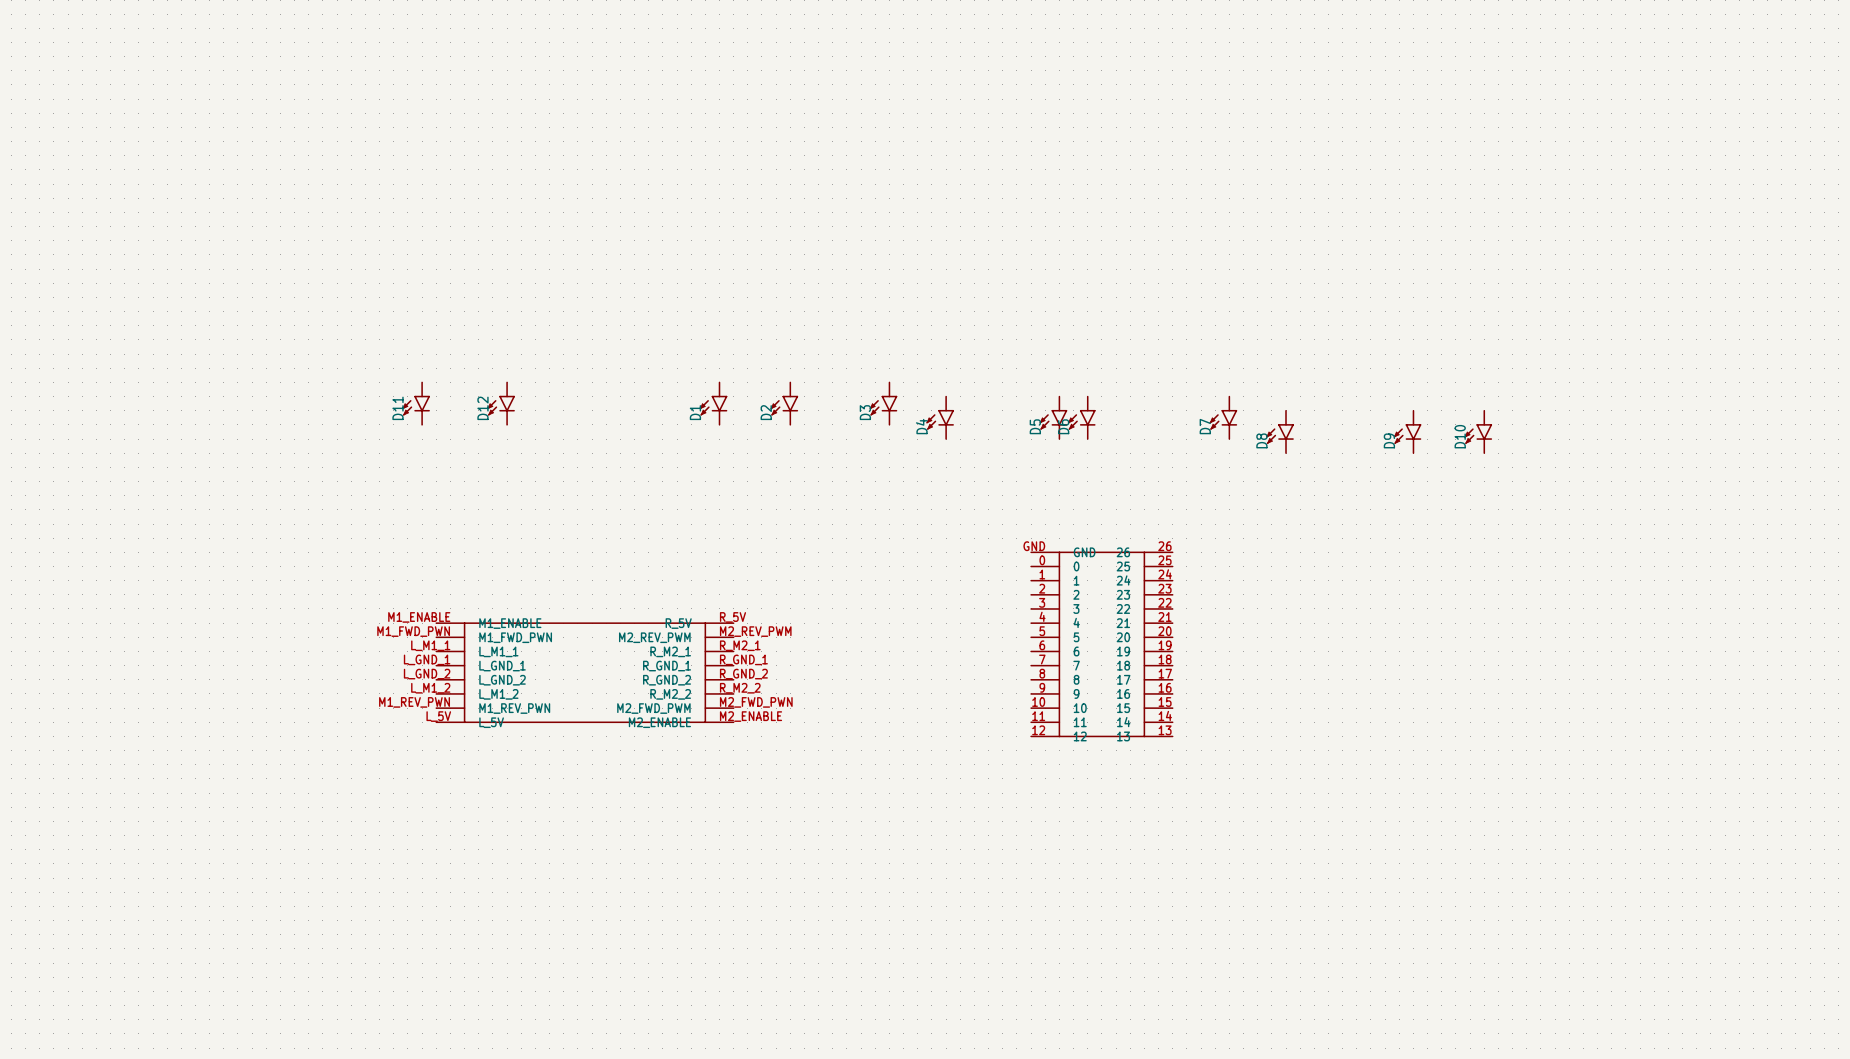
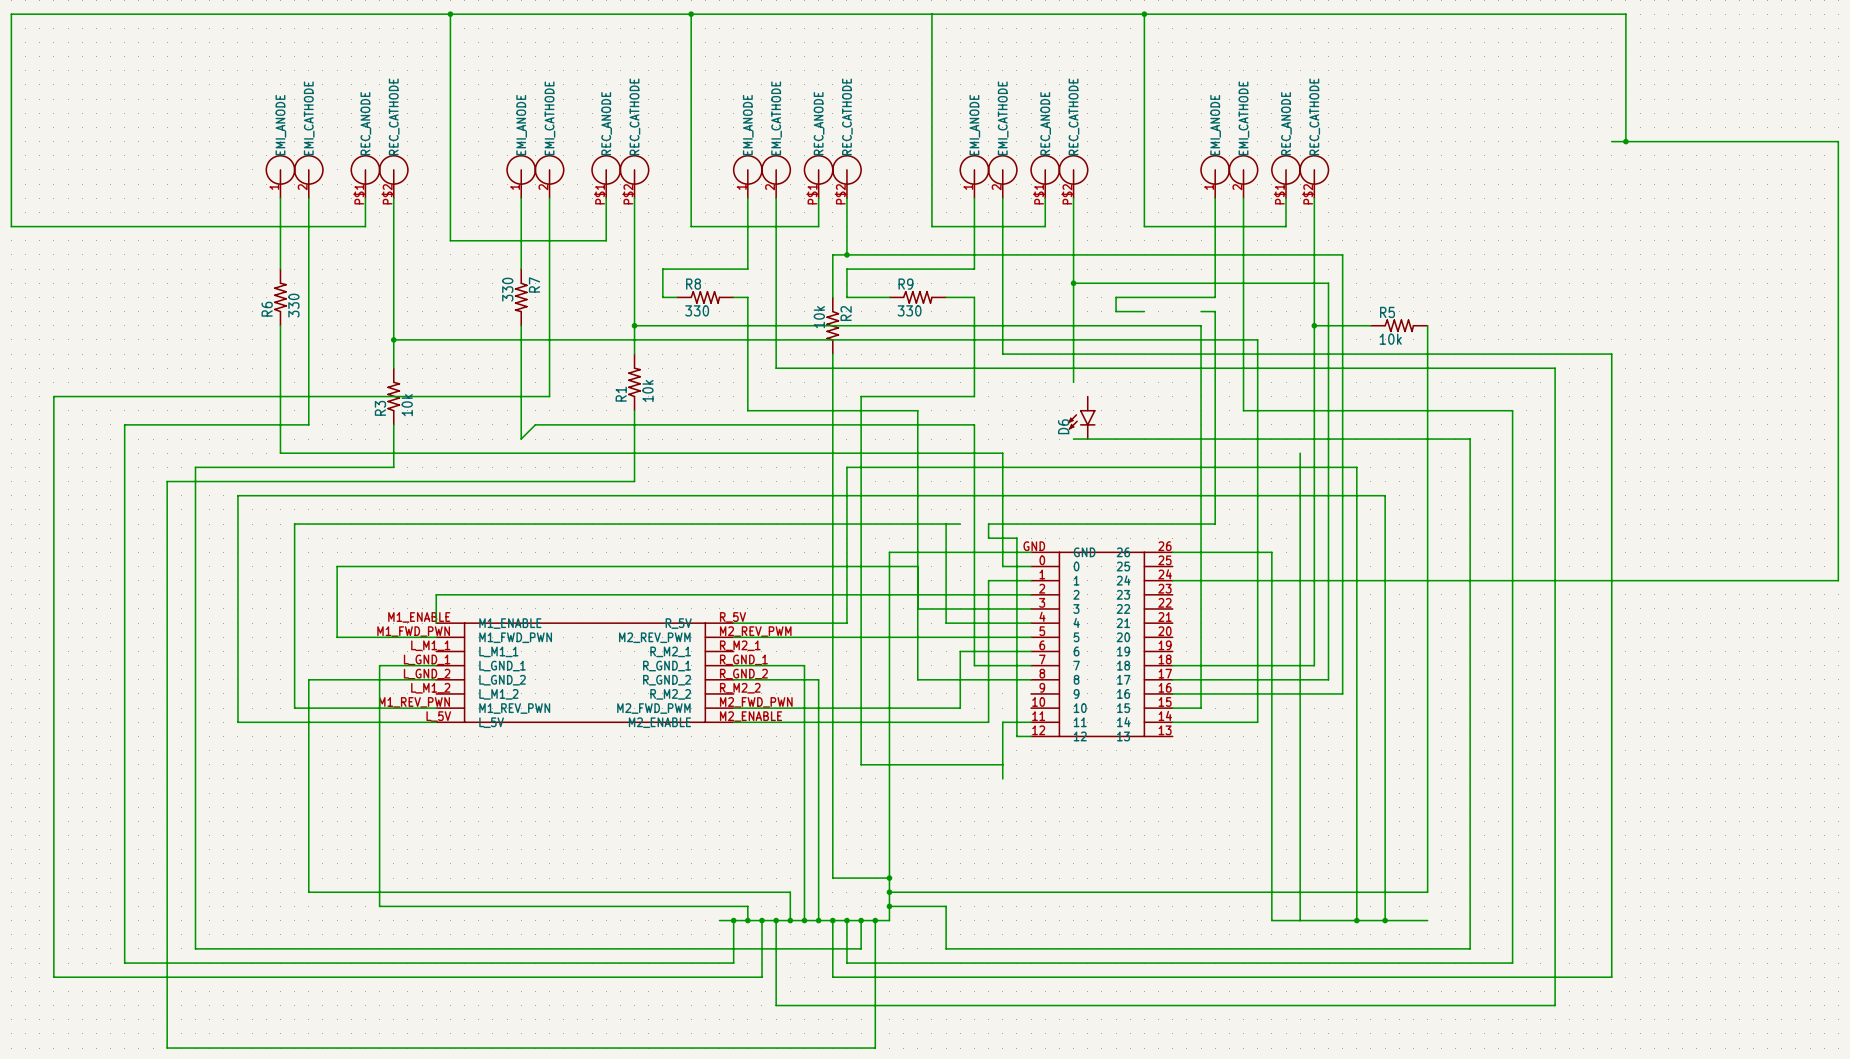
wire: none -> (450, 14) (450, 240) (606, 240) (606, 198)
junction: none -> (450, 14)
wire: none -> (691, 14) (691, 226) (818, 226) (818, 198)
junction: none -> (691, 14)
wire: none -> (931, 14) (931, 226) (1045, 226) (1045, 198)
wire: none -> (1144, 14) (1144, 226) (1286, 226) (1286, 198)
junction: none -> (1144, 14)
wire: none -> (1611, 141) (1838, 141) (1838, 580) (1172, 580)
wire: none -> (1625, 141) (1625, 14) (11, 14) (11, 226) (365, 226) (365, 198)
junction: none -> (1625, 141)
part: none -> (294, 176)
part: none -> (379, 176)
part: none -> (535, 176)
part: none -> (620, 176)
part: none -> (761, 176)
part: none -> (832, 176)
part: none -> (988, 176)
part: none -> (1059, 176)
part: none -> (1229, 176)
part: none -> (1300, 176)
wire: none -> (280, 198) (280, 269)
wire: none -> (308, 198) (308, 424) (124, 424) (124, 963) (733, 963) (733, 920)
wire: none -> (393, 198) (393, 368)
wire: none -> (521, 198) (521, 269)
wire: none -> (549, 198) (549, 396) (53, 396) (53, 977) (761, 977) (761, 920)
wire: none -> (634, 198) (634, 354)
wire: none -> (747, 198) (747, 269) (662, 269) (662, 297) (677, 297)
wire: none -> (776, 198) (776, 368) (1555, 368) (1555, 1005) (776, 1005) (776, 920)
wire: none -> (846, 198) (846, 254)
wire: none -> (974, 198) (974, 269) (846, 269) (846, 297) (889, 297)
wire: none -> (1002, 198) (1002, 354) (1611, 354) (1611, 977) (832, 977) (832, 920)
wire: none -> (1073, 198) (1073, 382)
wire: none -> (1215, 198) (1215, 297) (1116, 297) (1116, 311) (1144, 311)
wire: none -> (1243, 198) (1243, 410) (1512, 410) (1512, 963) (846, 963) (846, 920)
wire: none -> (1314, 198) (1314, 665) (1172, 665)
junction: none -> (846, 254)
wire: none -> (1073, 283) (1328, 283) (1328, 679) (1172, 679)
junction: none -> (1073, 283)
R6: none -> 330 (280, 297)
R7: none -> 330 (521, 297)
R8: none -> 330 (705, 297)
wire: none -> (733, 297) (747, 297) (747, 410) (917, 410) (917, 679) (1031, 679)
wire: none -> (832, 297) (832, 254) (1342, 254) (1342, 693) (1172, 693)
R9: none -> 330 (917, 297)
wire: none -> (946, 297) (974, 297) (974, 396) (861, 396) (861, 764) (1002, 764)
wire: none -> (1201, 311) (1215, 311) (1215, 524) (988, 524) (988, 538) (1016, 538) (1016, 736) (1031, 736)
wire: none -> (280, 325) (280, 453) (1002, 453) (1002, 566) (1031, 566)
wire: none -> (521, 325) (521, 439) (535, 424) (974, 424) (974, 665) (1031, 665)
wire: none -> (634, 325) (1201, 325) (1201, 708) (1172, 708)
junction: none -> (634, 325)
R2: none -> 10k (832, 325)
wire: none -> (1314, 325) (1370, 325)
junction: none -> (1314, 325)
R5: none -> 10k (1399, 325)
wire: none -> (1427, 325) (1427, 892) (889, 892)
wire: none -> (393, 339) (1257, 339) (1257, 722) (1172, 722)
junction: none -> (393, 339)
wire: none -> (832, 354) (832, 878) (889, 878)
R1: none -> 10k (634, 382)
R3: none -> 10k (393, 396)
D11: (416, 403) -> none
D12: (501, 403) -> none
D1: (713, 403) -> none
D2: (784, 403) -> none
D3: (883, 403) -> none
wire: none -> (634, 410) (634, 481) (167, 481) (167, 1048) (875, 1048) (875, 920)
D4: (940, 417) -> none
D5: (1053, 417) -> none
D7: (1223, 417) -> none
wire: none -> (393, 424) (393, 467) (195, 467) (195, 948) (861, 948) (861, 920)
D8: (1280, 431) -> none
D9: (1407, 431) -> none
D10: (1478, 431) -> none
wire: none -> (1073, 439) (1470, 439) (1470, 948) (946, 948) (946, 906) (889, 906)
wire: none -> (1300, 453) (1300, 920)
wire: none -> (946, 524) (946, 623) (1031, 623)
wire: none -> (960, 524) (294, 524) (294, 708) (436, 708)
wire: none -> (1031, 552) (889, 552) (889, 920) (719, 920)
wire: none -> (1172, 552) (1271, 552) (1271, 920) (1427, 920)
wire: none -> (917, 566) (337, 566) (337, 637) (436, 637)
wire: none -> (1031, 580) (988, 580) (988, 722) (733, 722)
wire: none -> (1031, 594) (436, 594) (436, 623)
wire: none -> (917, 608) (1031, 608)
wire: none -> (733, 623) (846, 623) (846, 467) (1356, 467) (1356, 920)
wire: none -> (733, 637) (1031, 637)
wire: none -> (1031, 651) (960, 651) (960, 708) (733, 708)
wire: none -> (436, 665) (379, 665) (379, 906) (747, 906) (747, 920)
wire: none -> (733, 665) (804, 665) (804, 920)
wire: none -> (436, 679) (308, 679) (308, 892) (790, 892) (790, 920)
wire: none -> (733, 679) (818, 679) (818, 920)
wire: none -> (436, 722) (237, 722) (237, 495) (1385, 495) (1385, 920)
wire: none -> (1031, 722) (1002, 722) (1002, 778)
junction: none -> (889, 878)
junction: none -> (889, 892)
junction: none -> (889, 906)
junction: none -> (733, 920)
junction: none -> (747, 920)
junction: none -> (761, 920)
junction: none -> (776, 920)
junction: none -> (790, 920)
junction: none -> (804, 920)
junction: none -> (818, 920)
junction: none -> (832, 920)
junction: none -> (846, 920)
junction: none -> (861, 920)
junction: none -> (875, 920)
junction: none -> (1356, 920)
junction: none -> (1385, 920)

